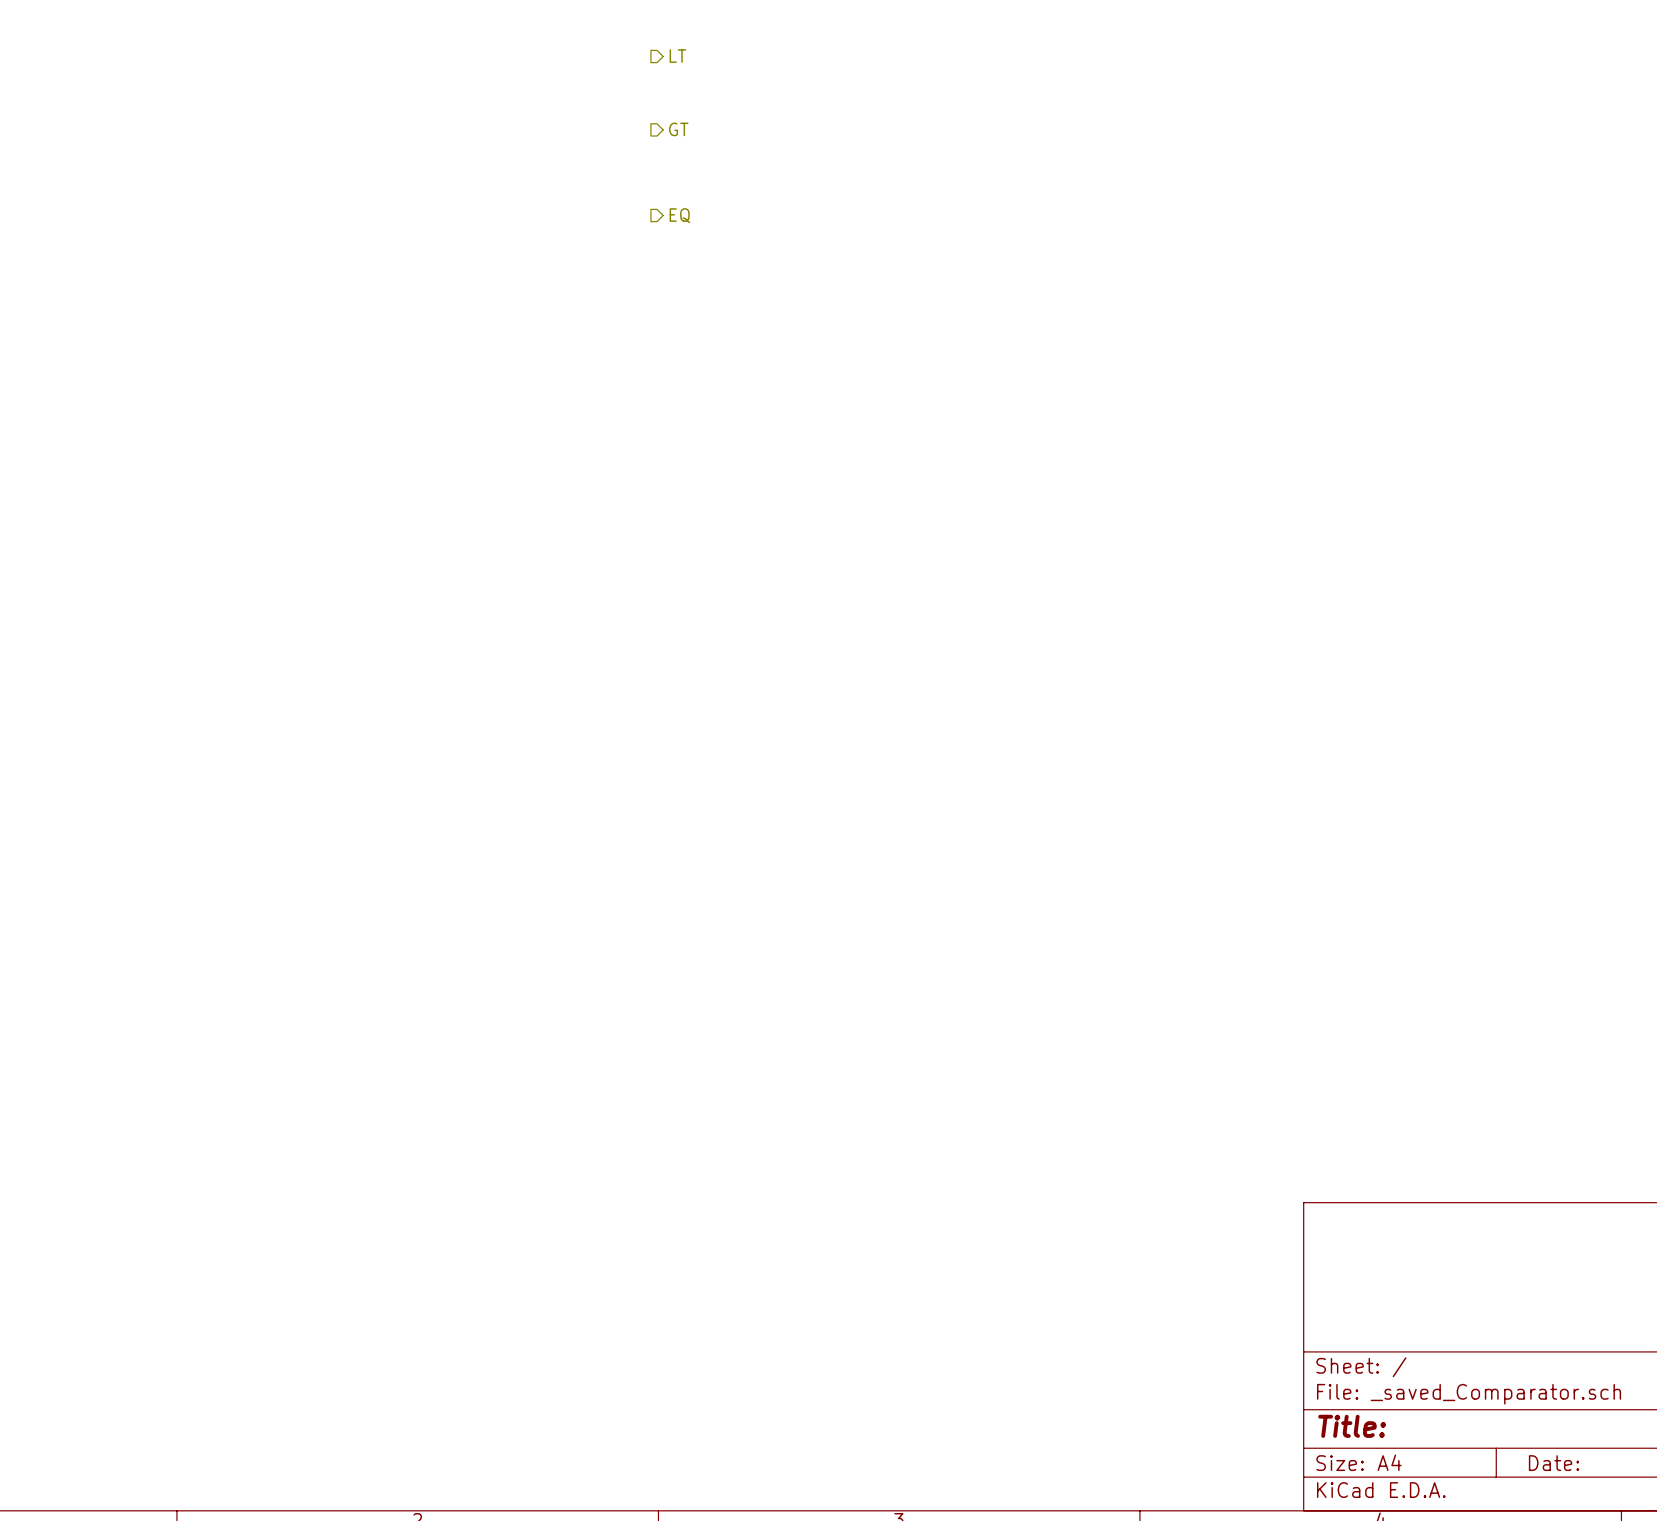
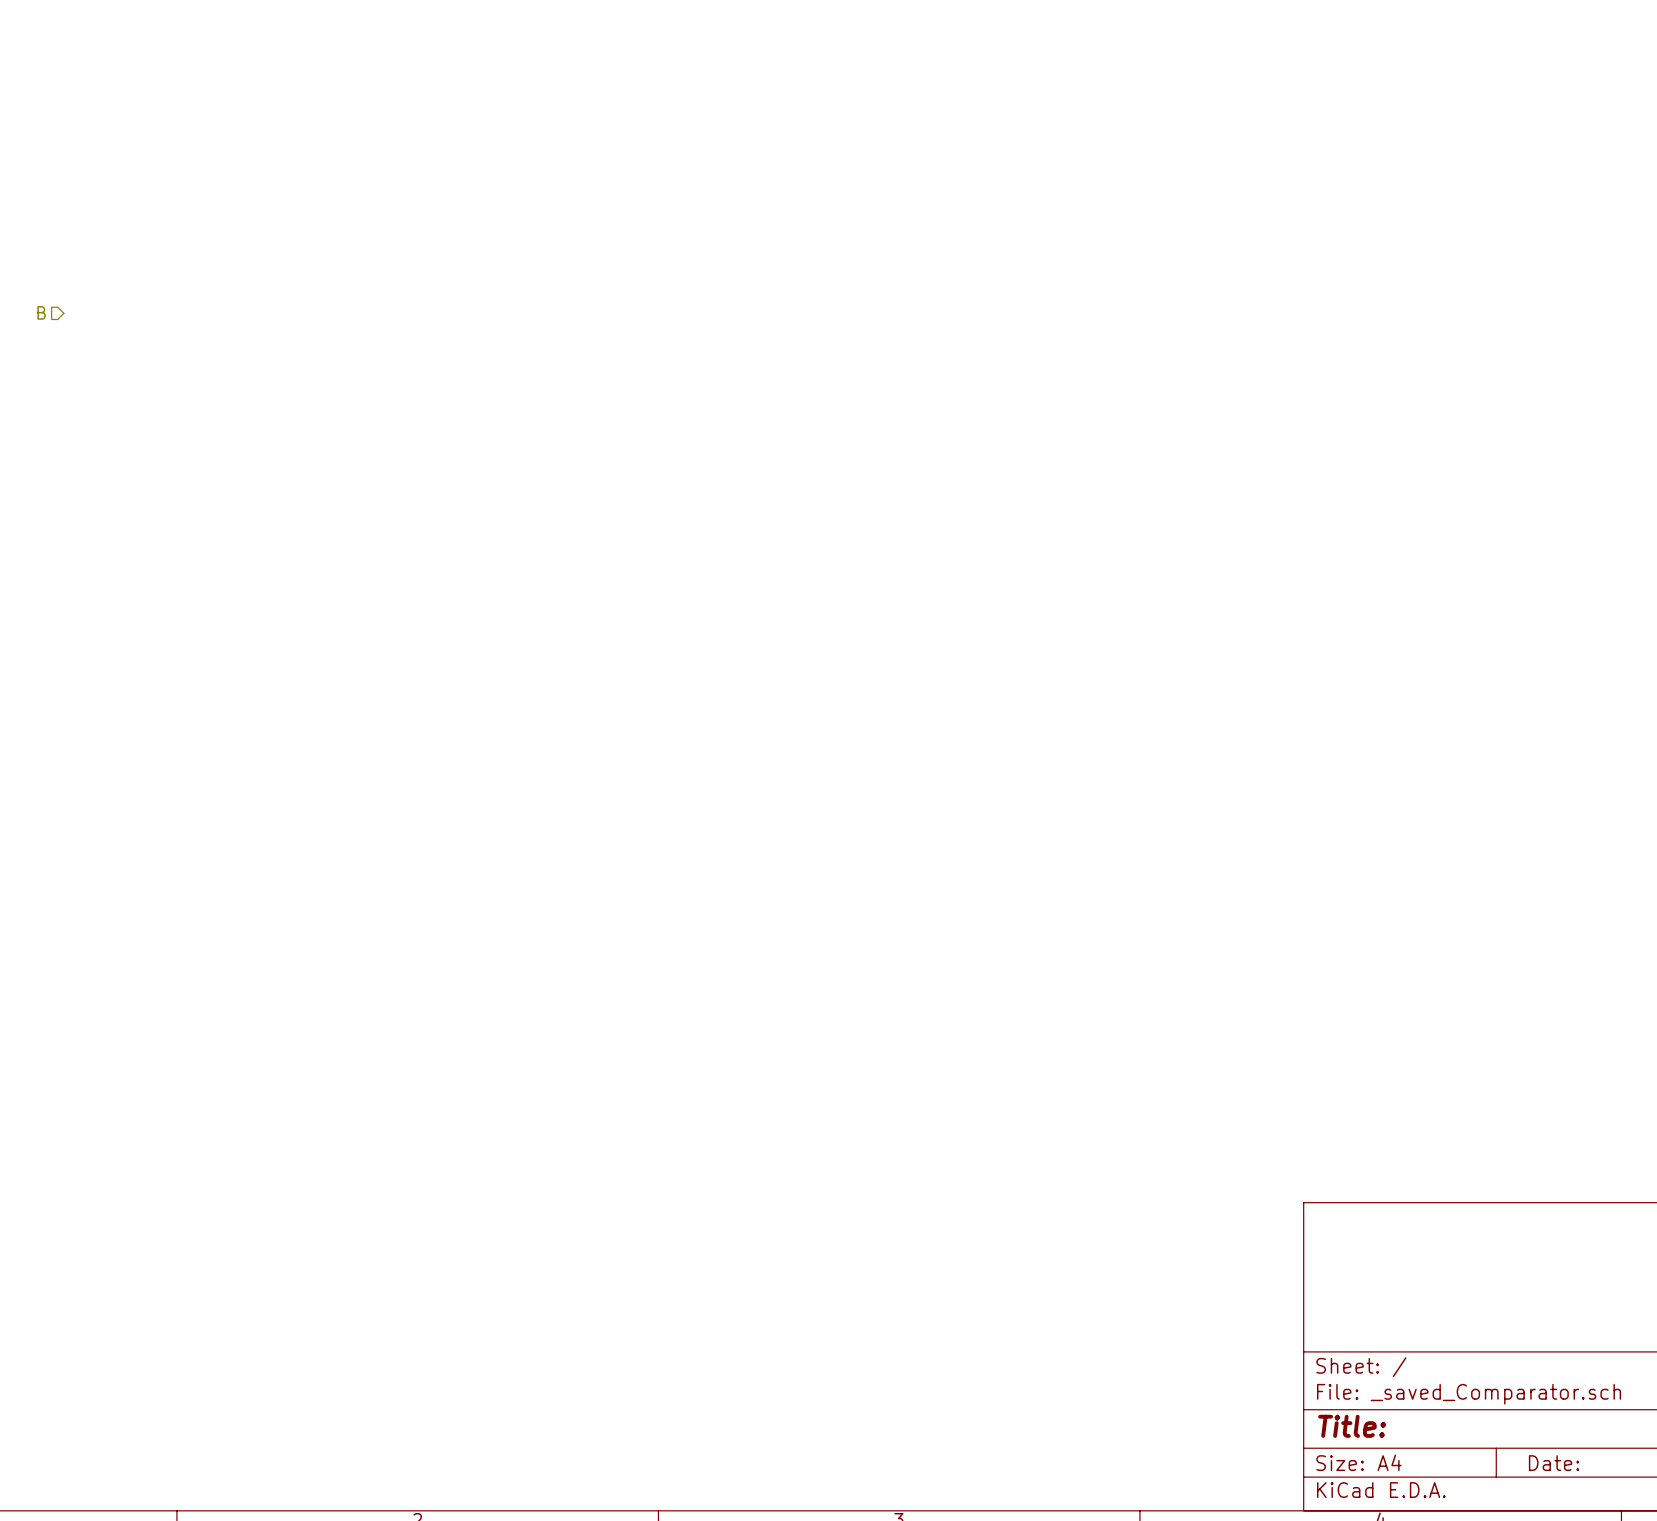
hierarchical label: LT (677, 56) -> none
hierarchical label: GT (678, 129) -> none
hierarchical label: EQ (679, 215) -> none
hierarchical label: none -> B (41, 312)

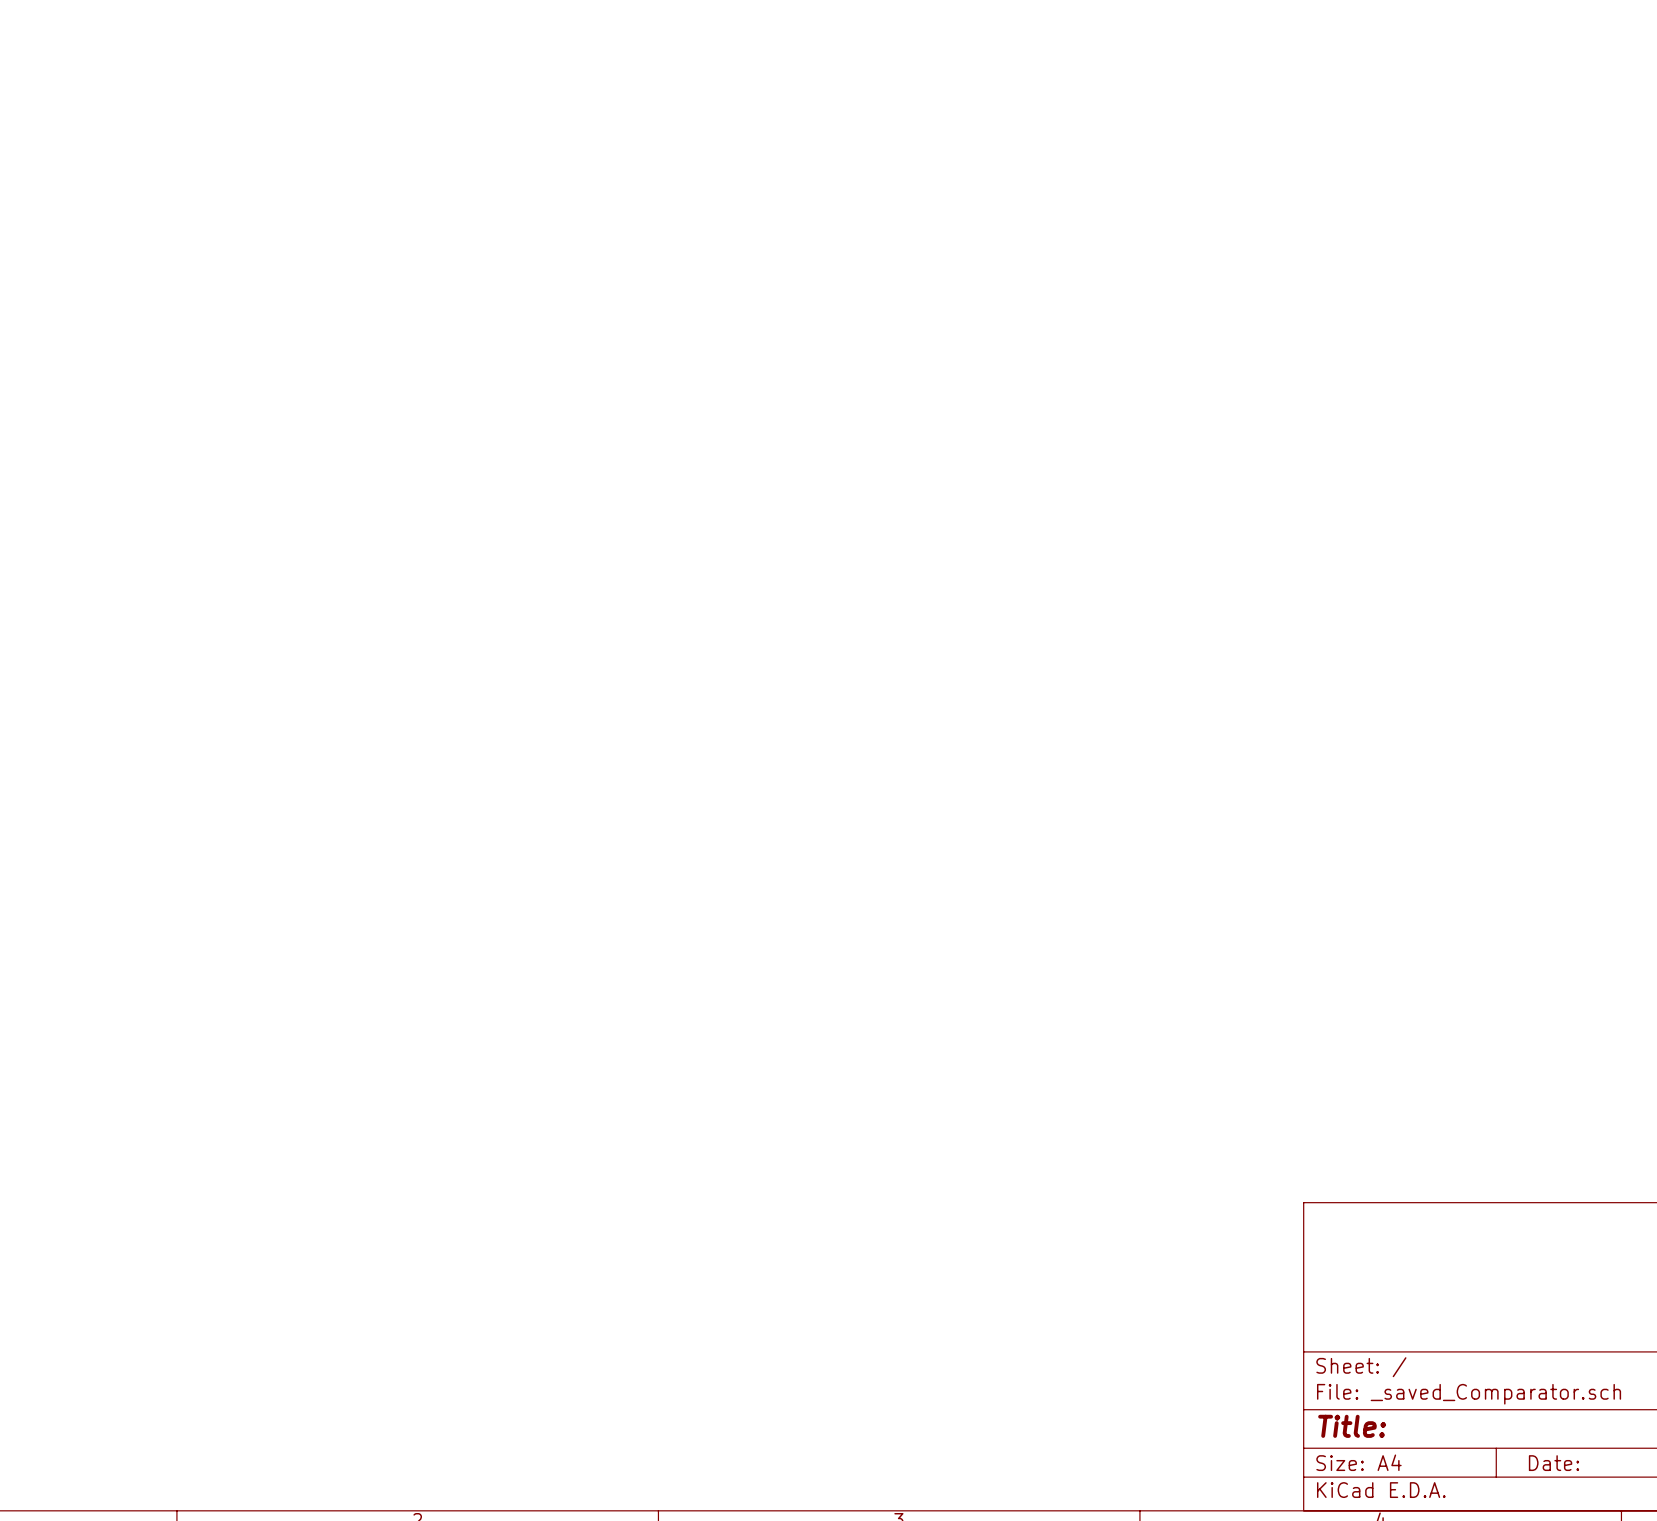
hierarchical label: B (41, 312) -> none

